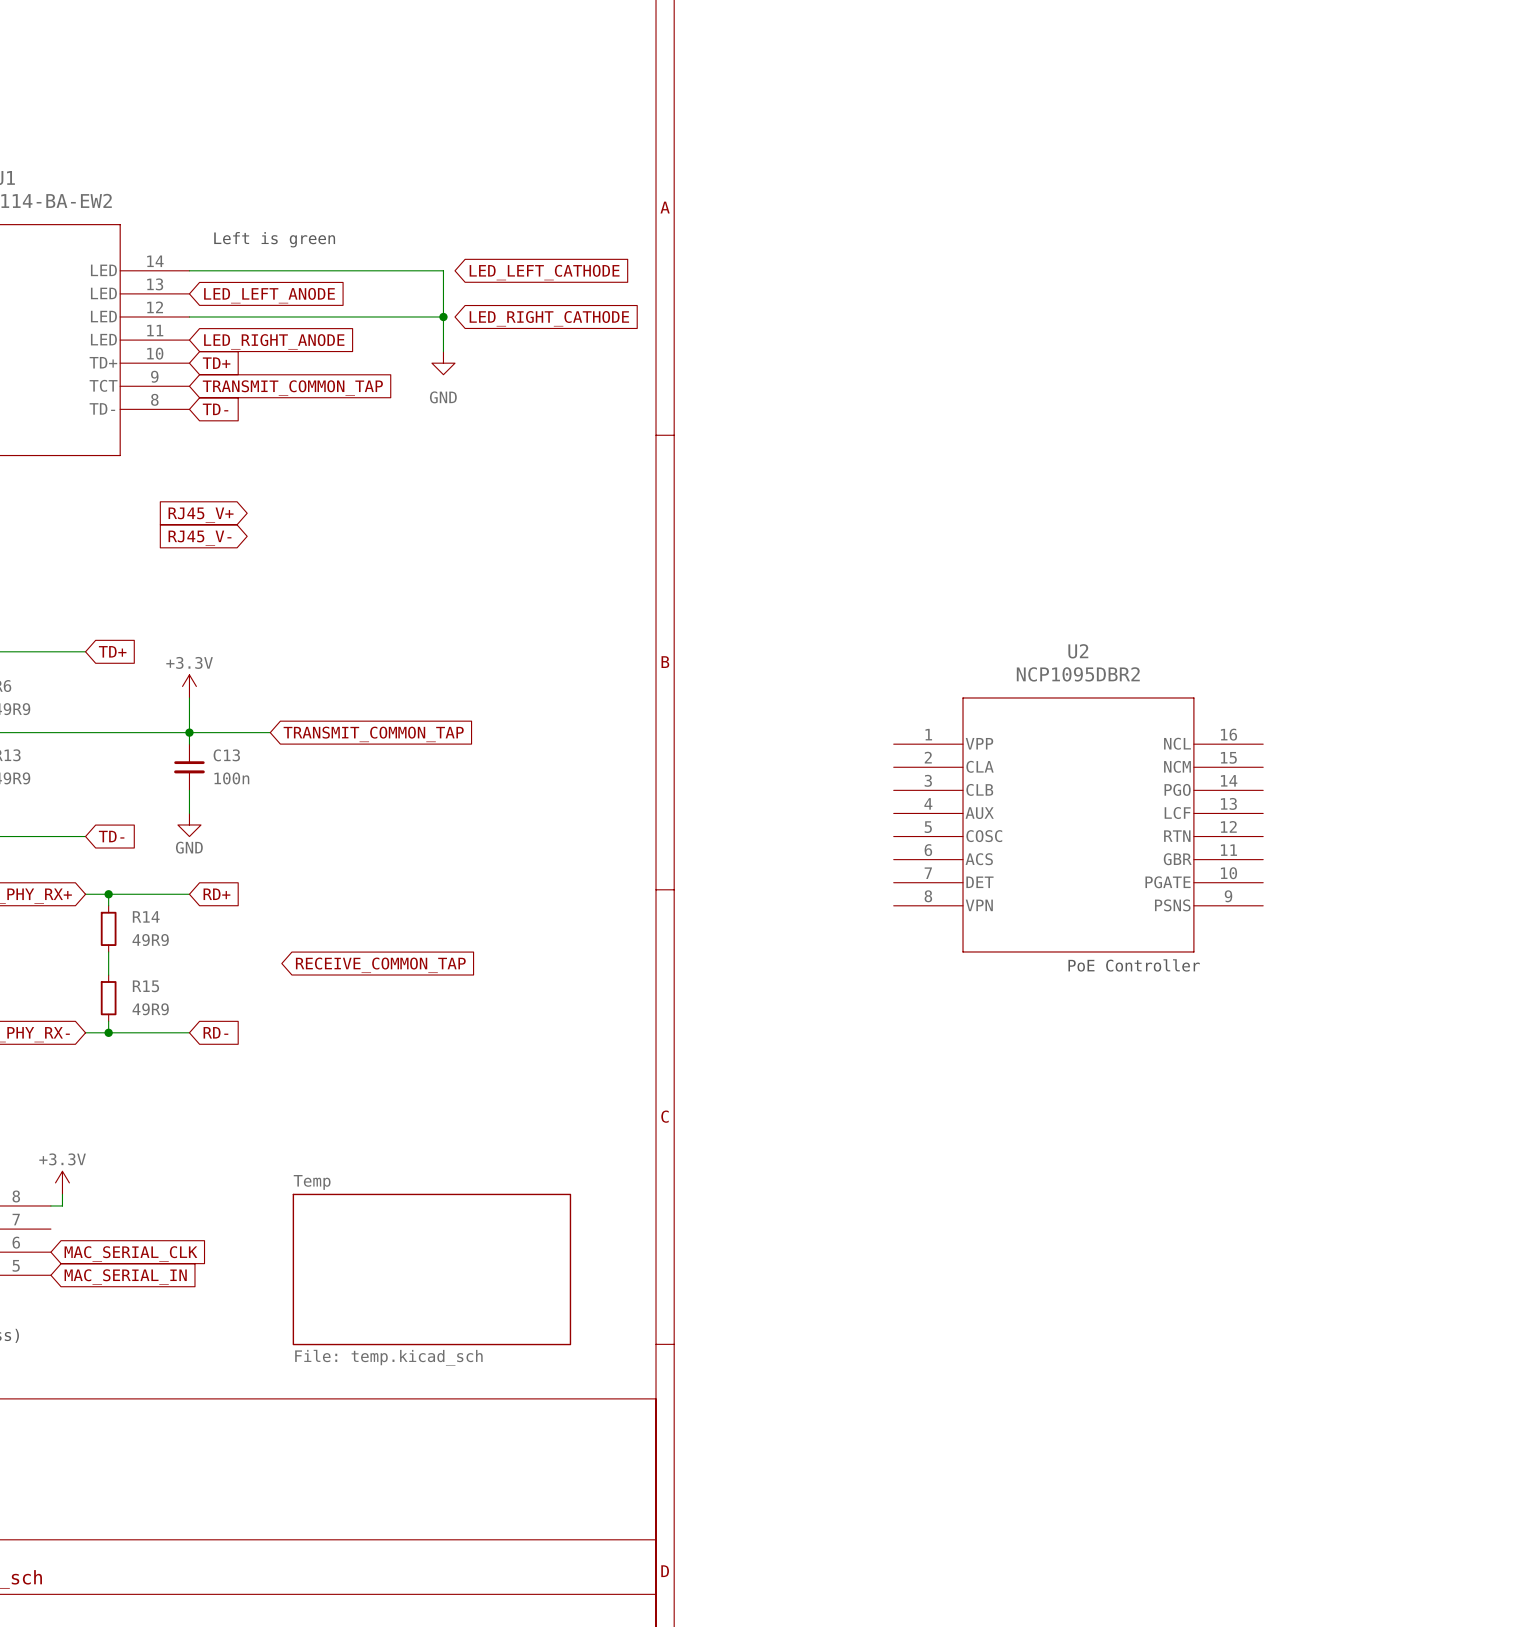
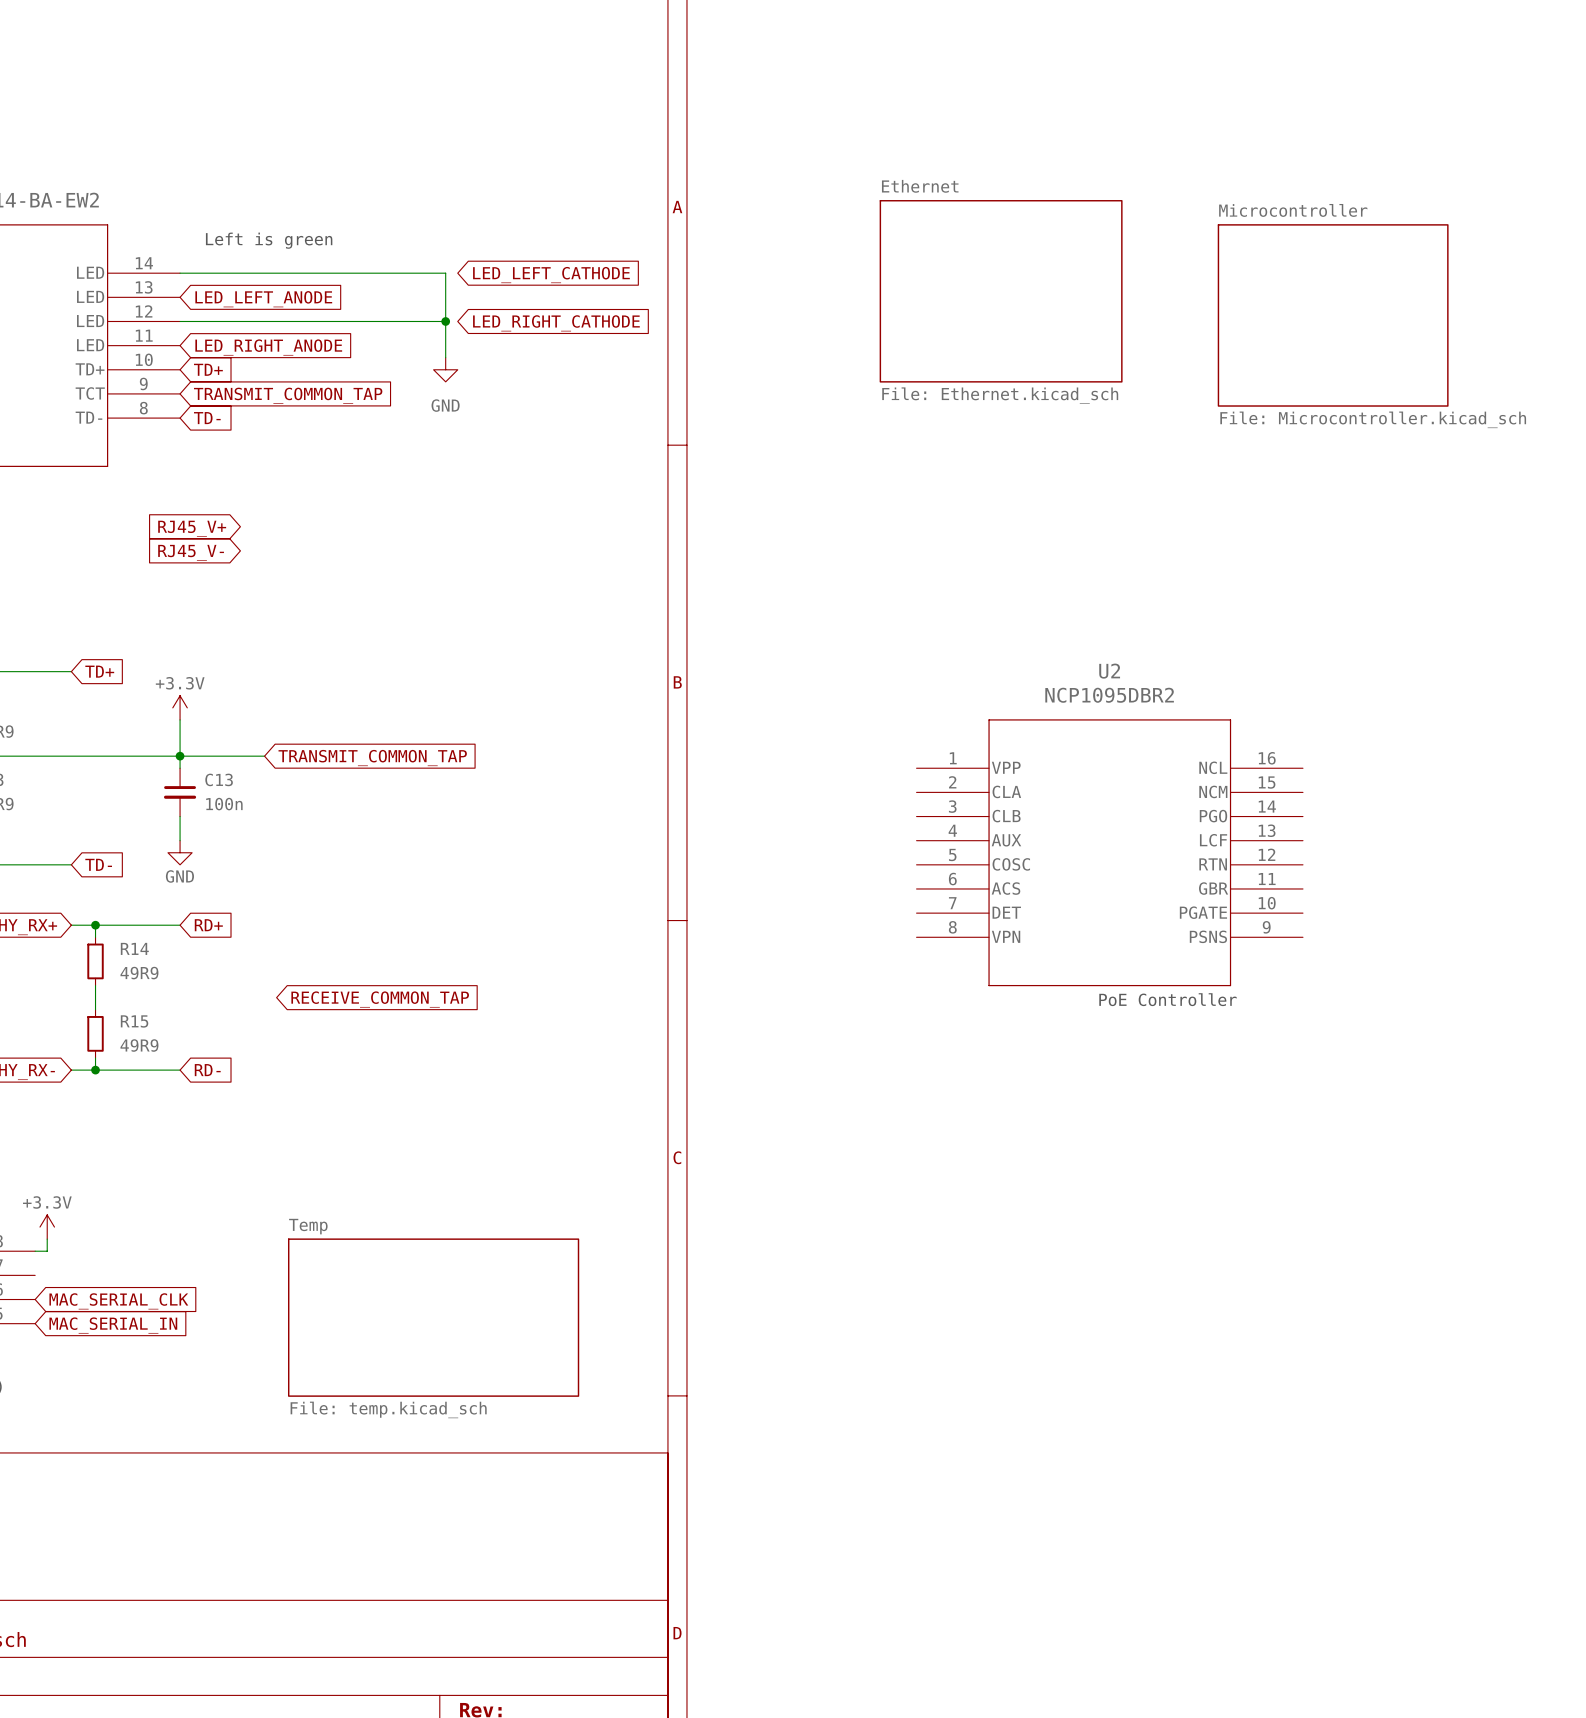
sheet Ethernet: none -> File: Ethernet.kicad_sch (1001, 291)
sheet Microcontroller: none -> File: Microcontroller.kicad_sch (1333, 315)

